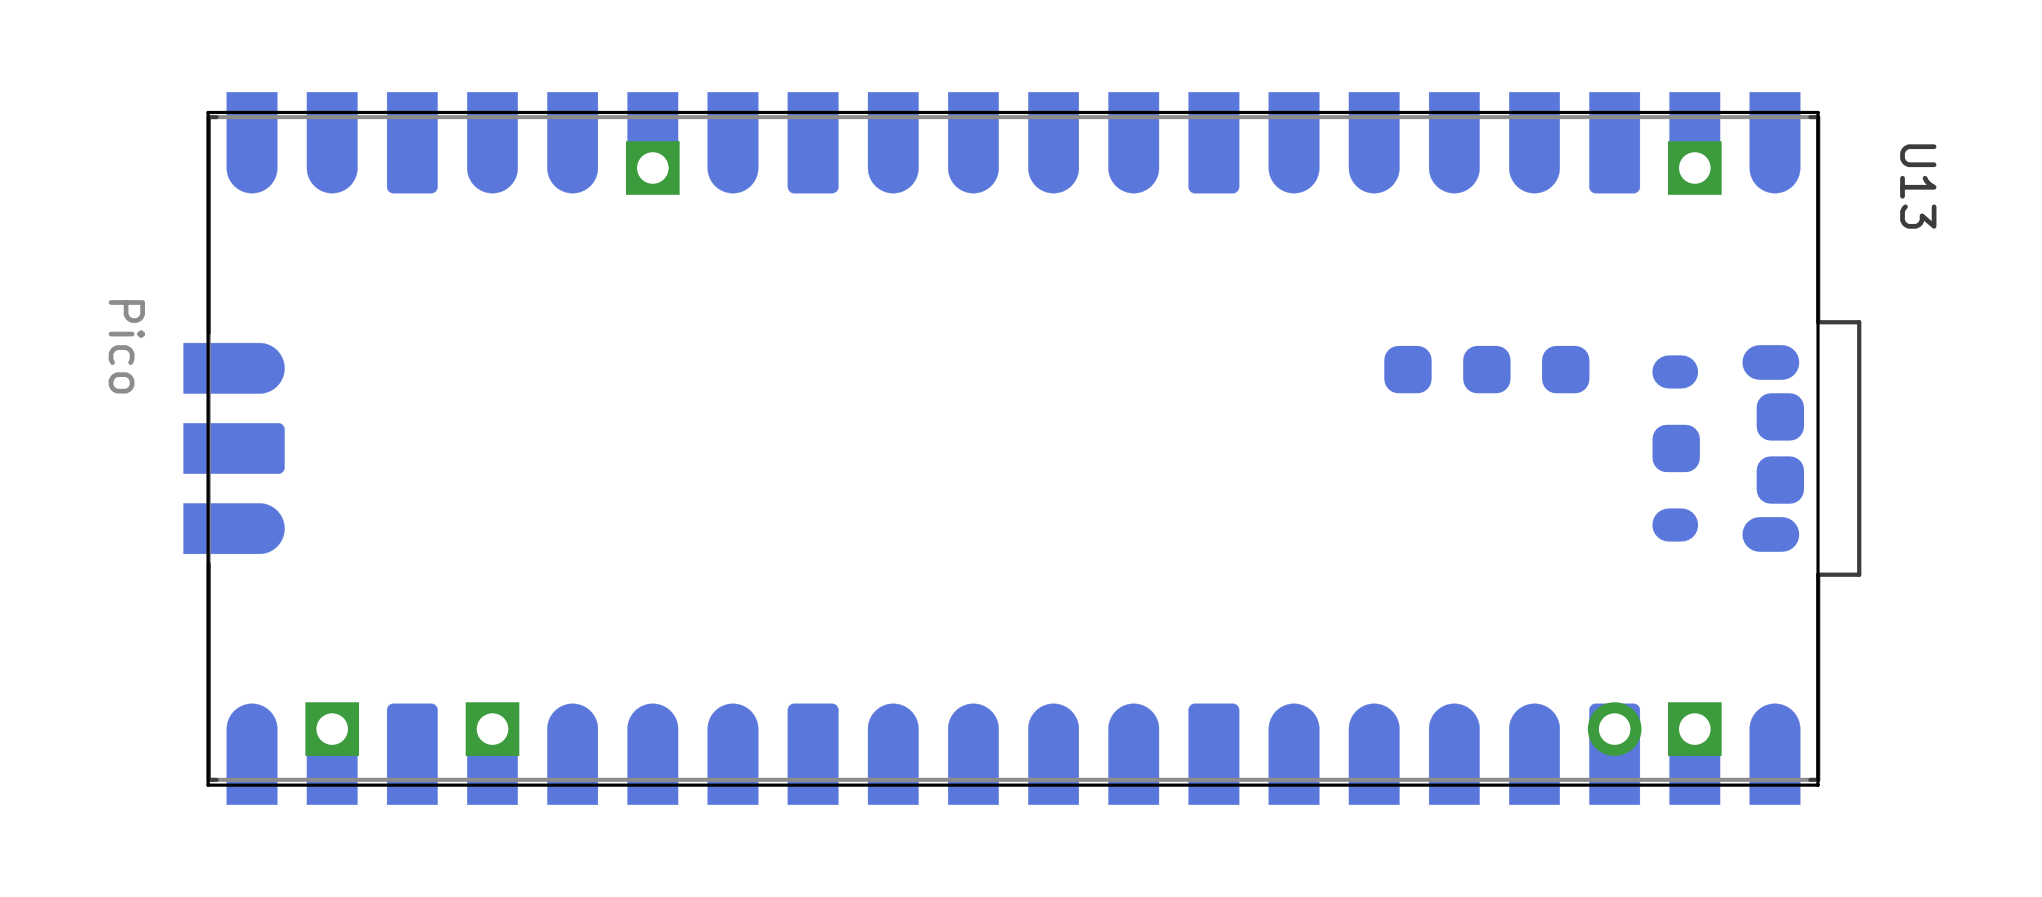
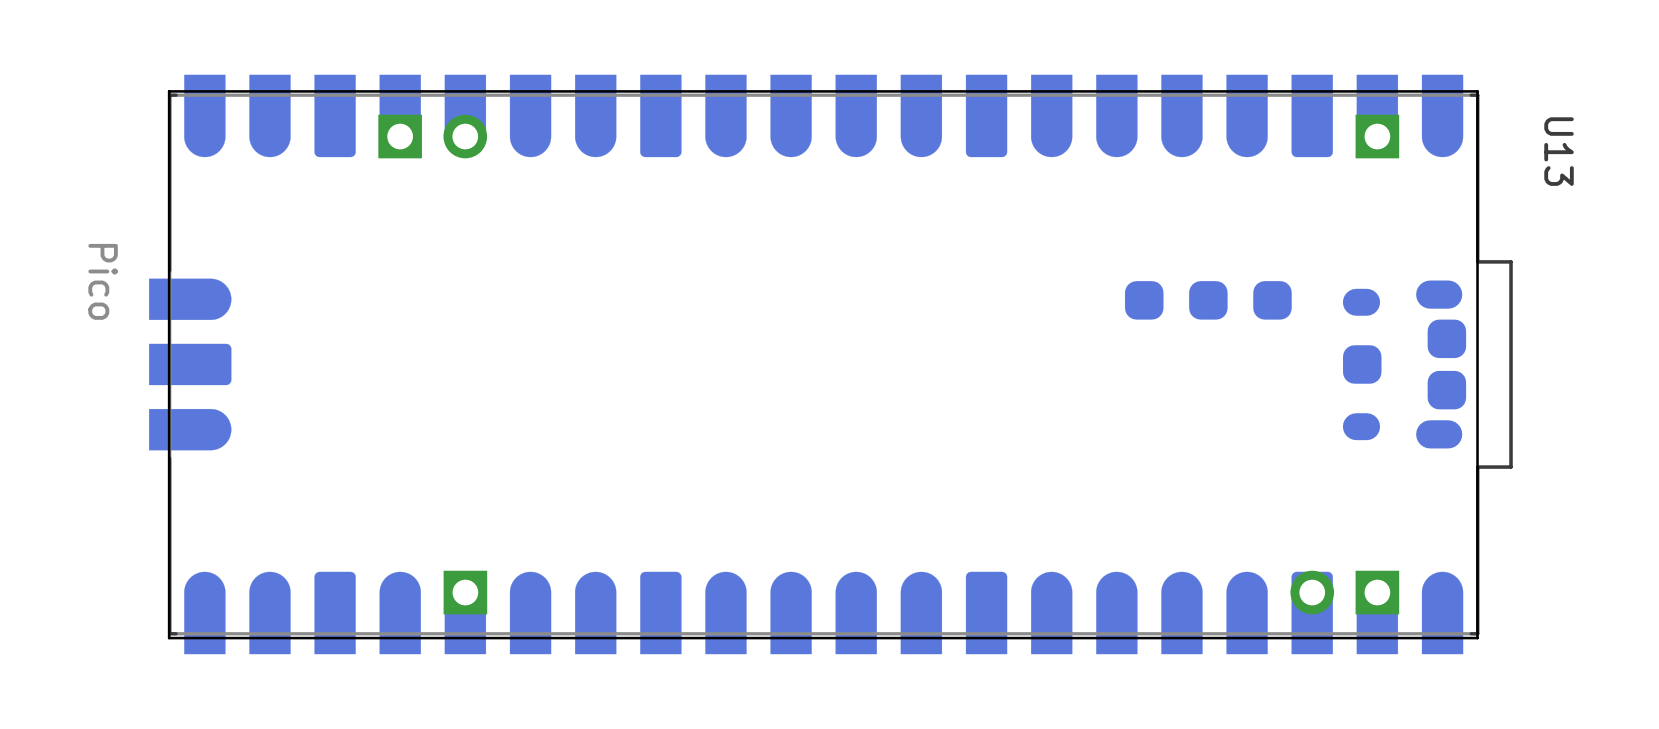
part: none -> (432, 136)
part: (652, 168) -> none
part: (332, 729) -> none
part position: (492, 729) -> (465, 592)

